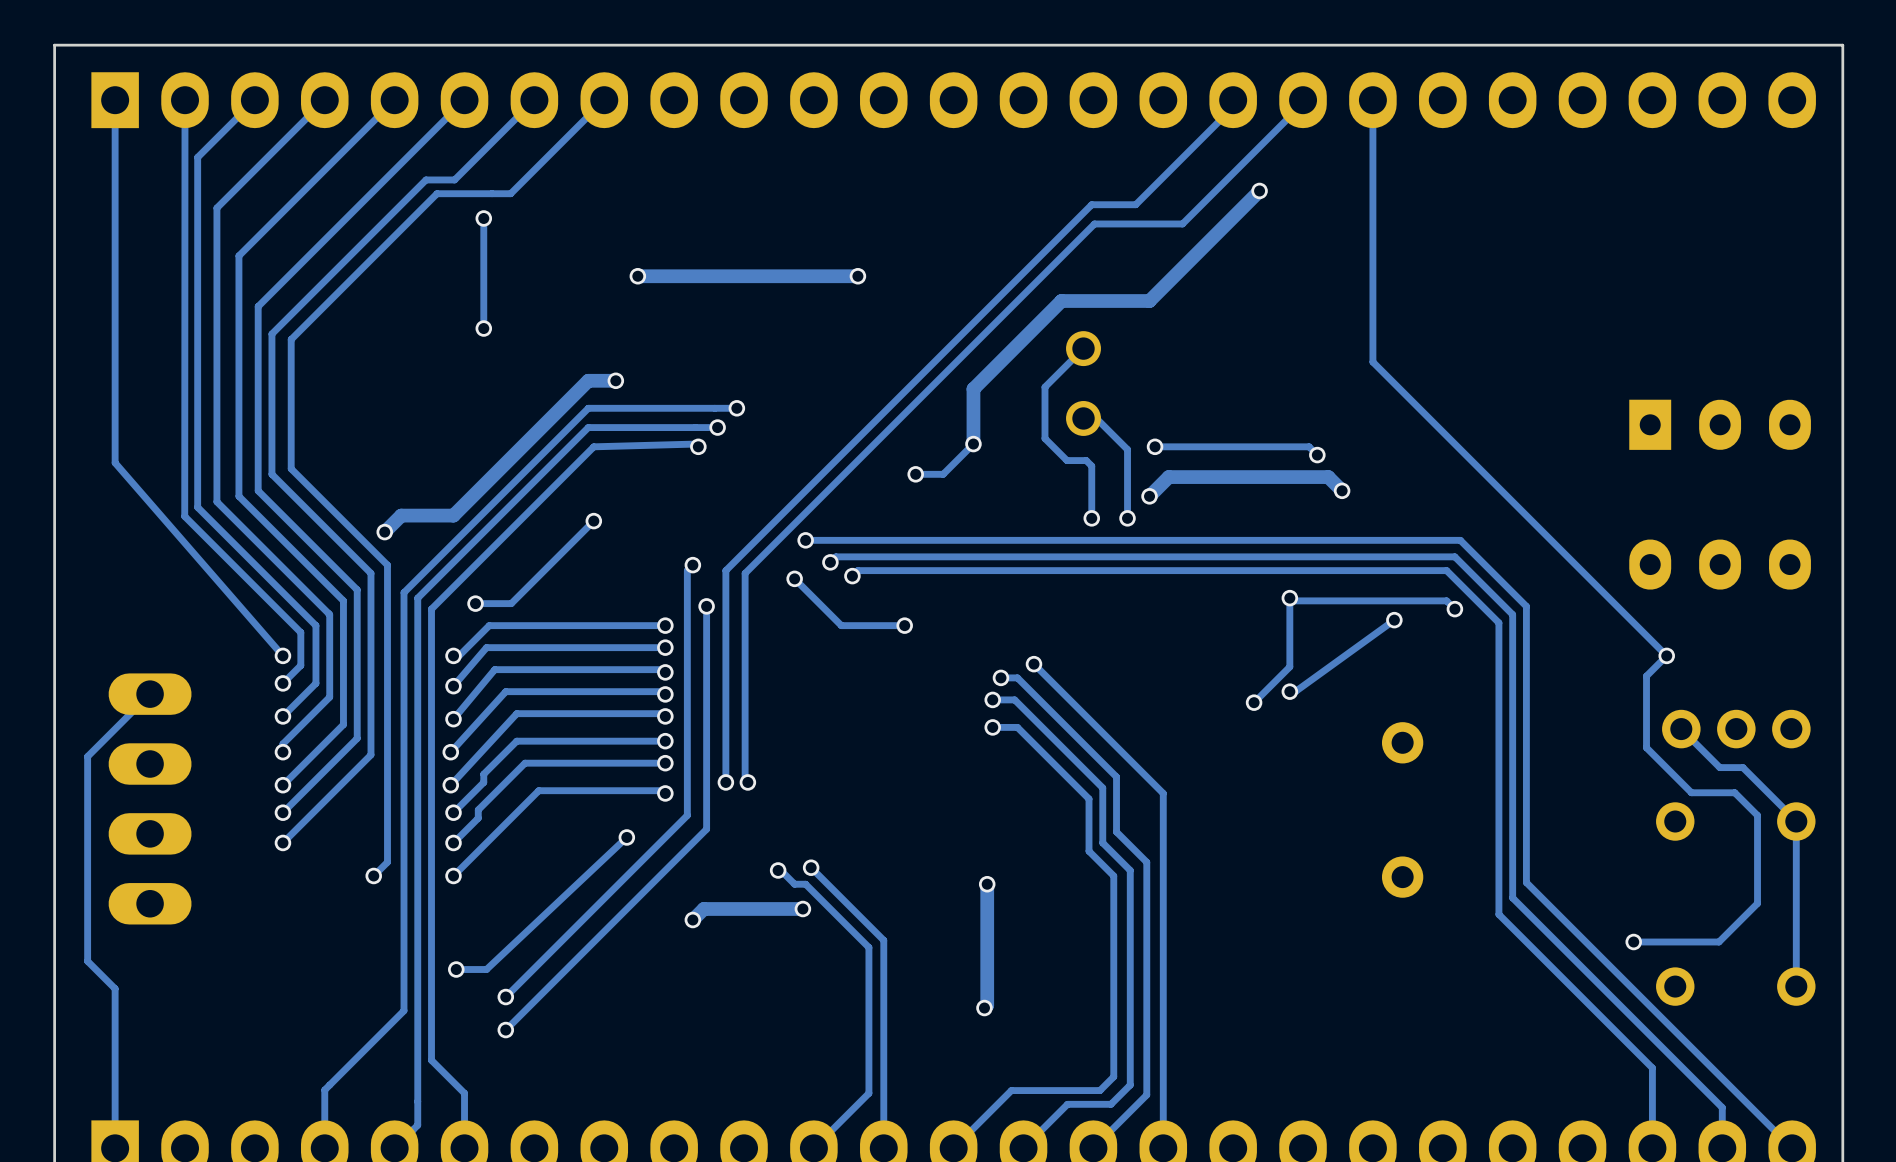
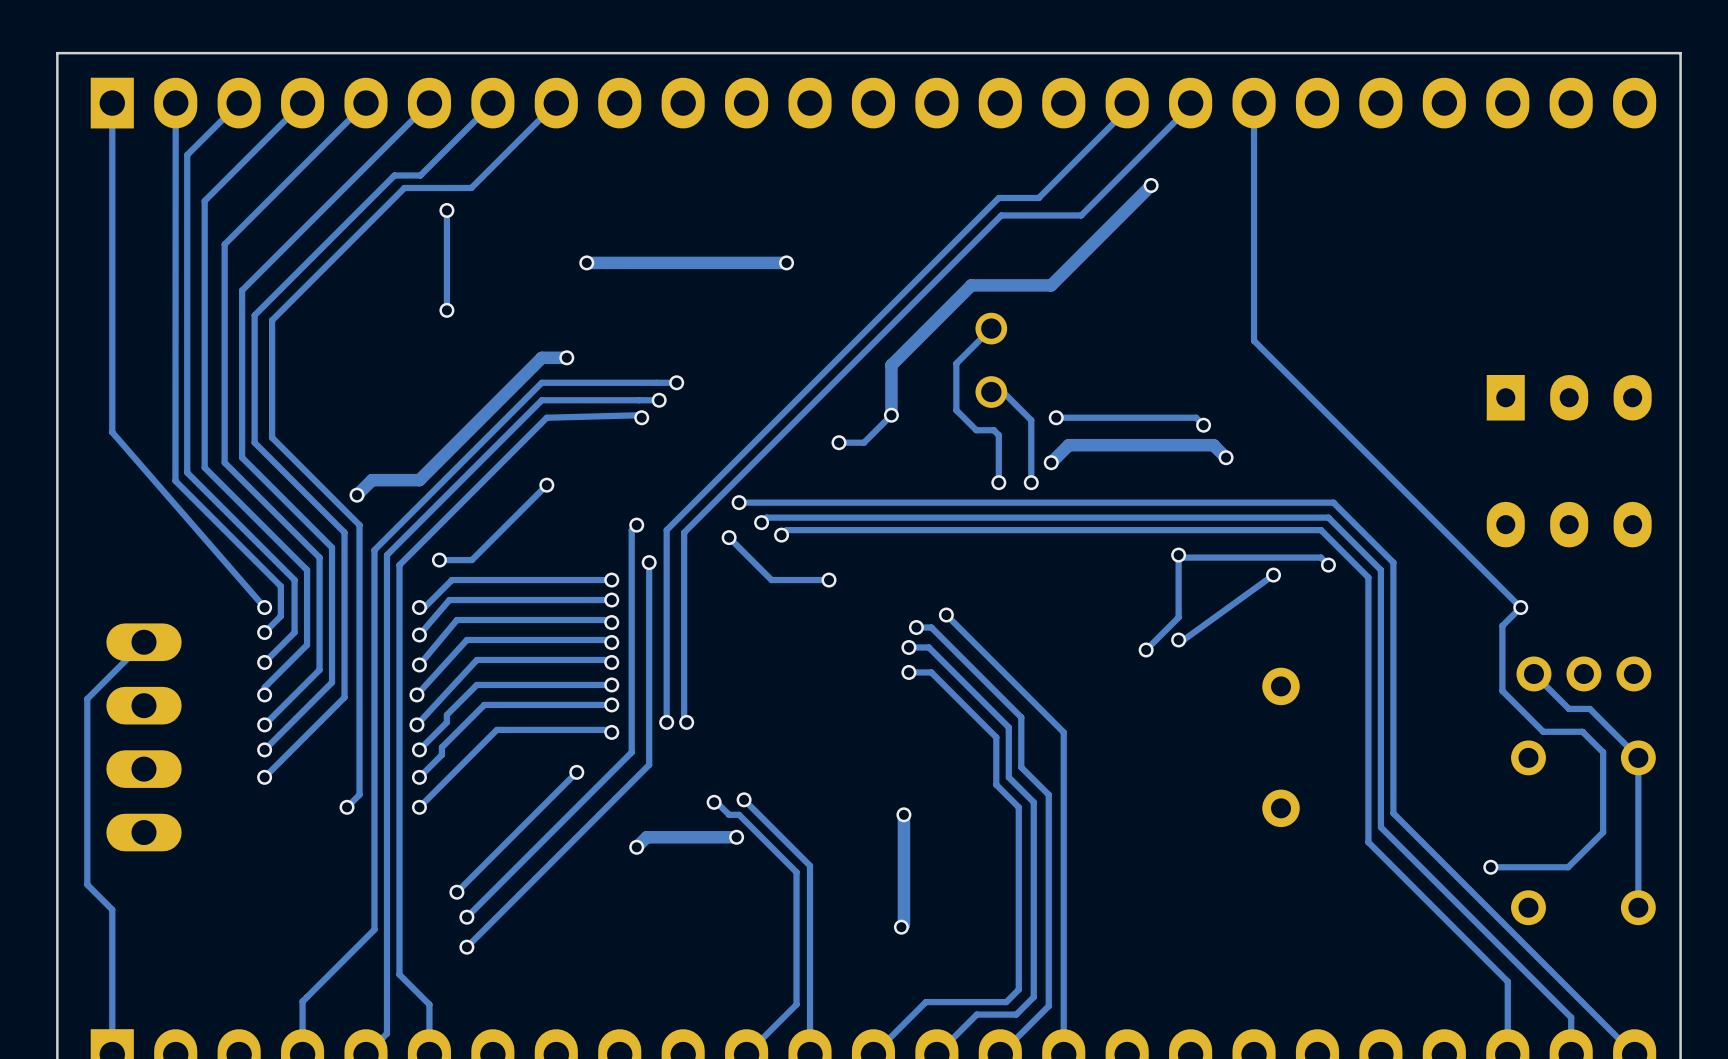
track: (626, 837) (486, 969) (456, 969) -> (576, 772) (456, 892)
via position: (456, 969) -> (456, 892)

